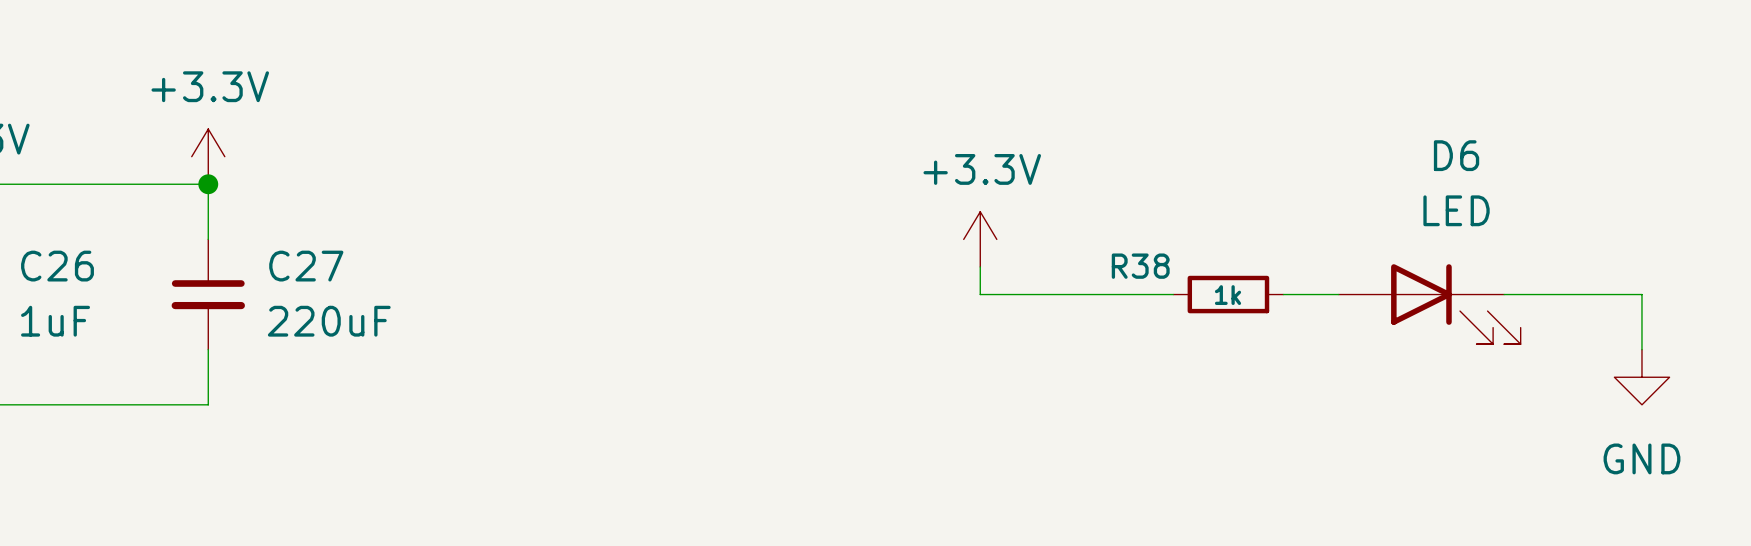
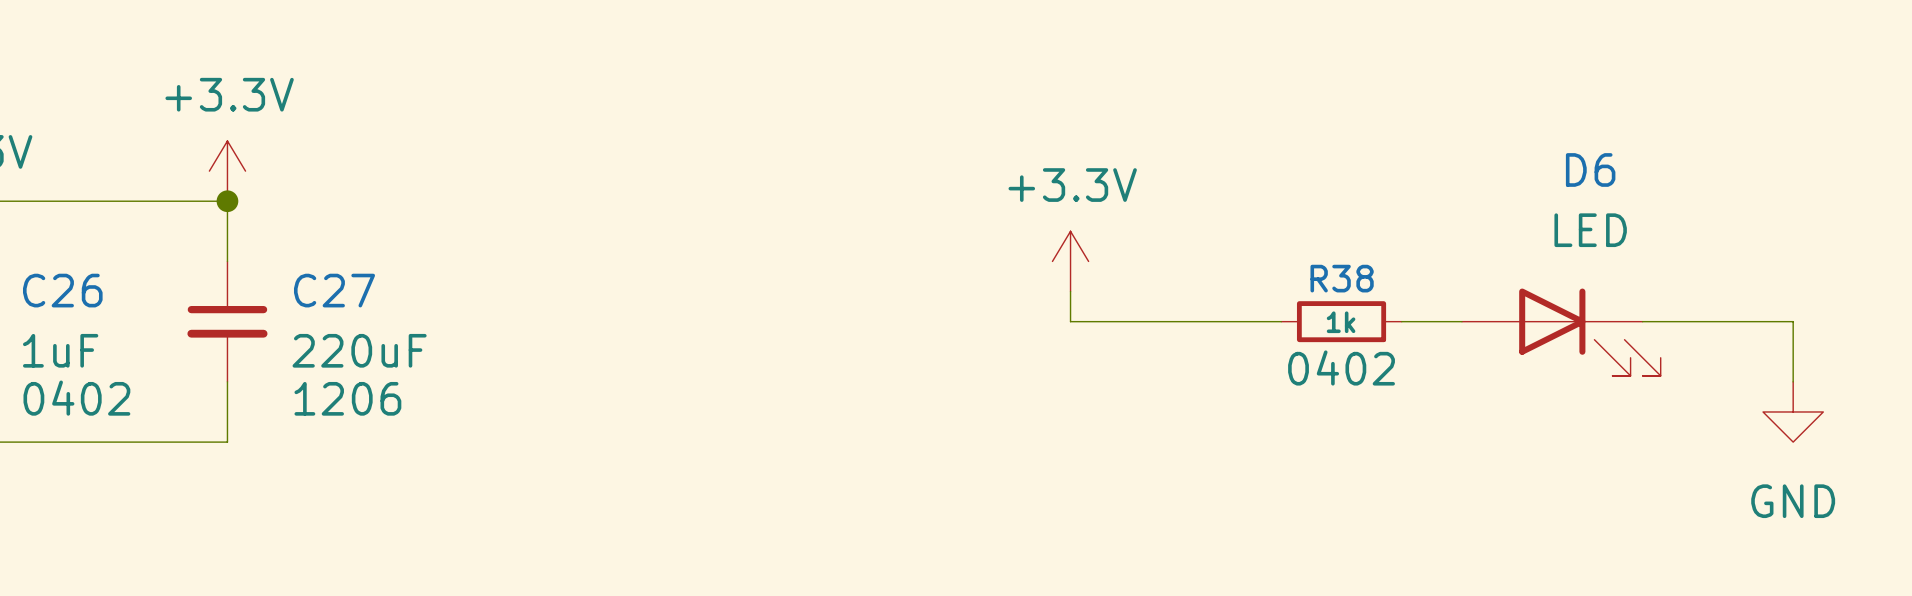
R38 name position: R38 (1140, 266) -> R38 (1342, 278)
R38 text: none -> 0402 (1341, 367)
C26 text: none -> 0402 (76, 398)
C27 text: none -> 1206 (347, 398)

